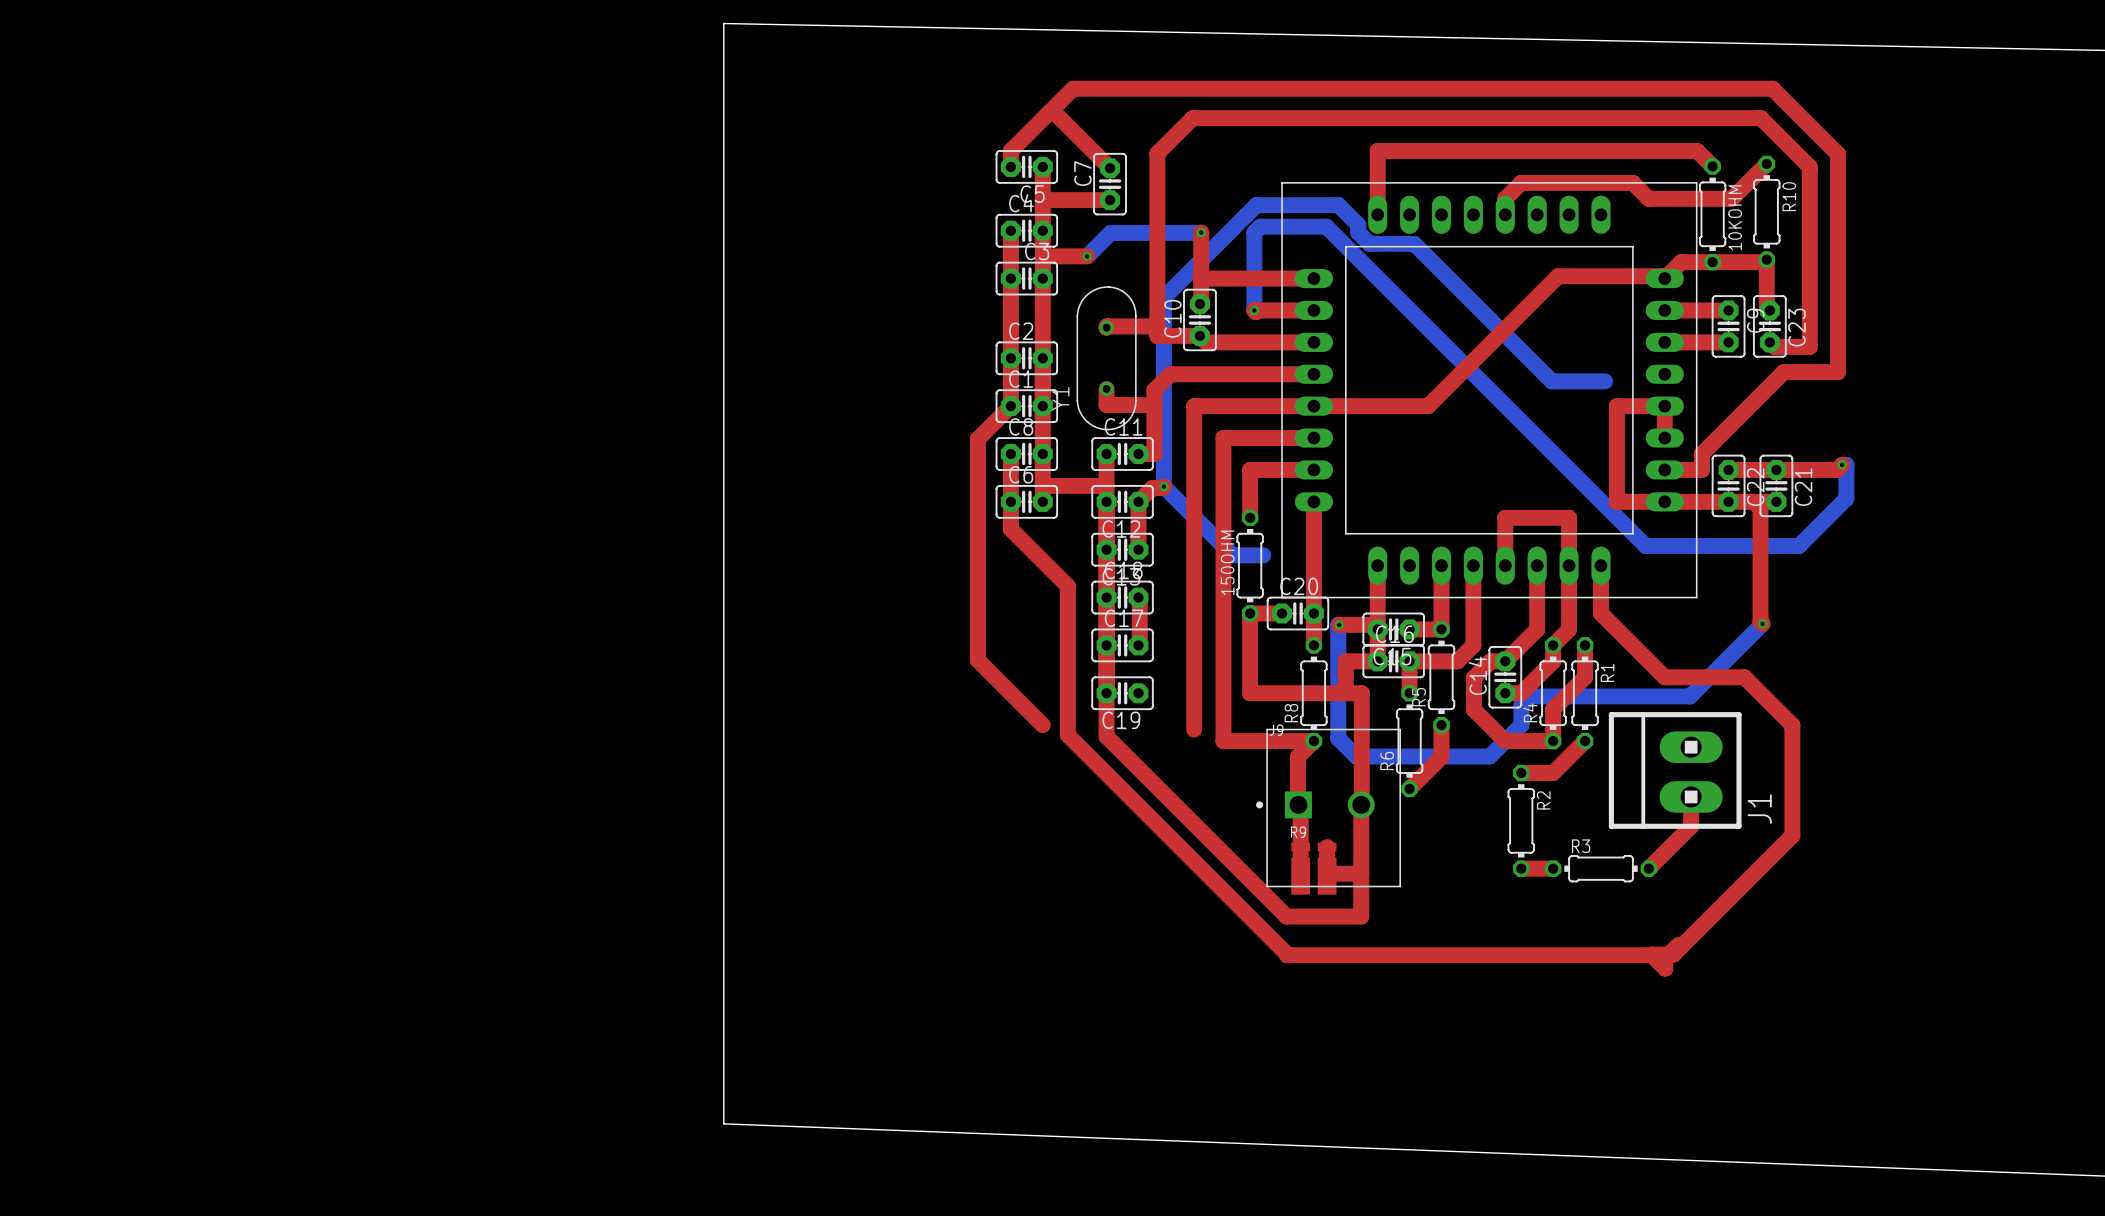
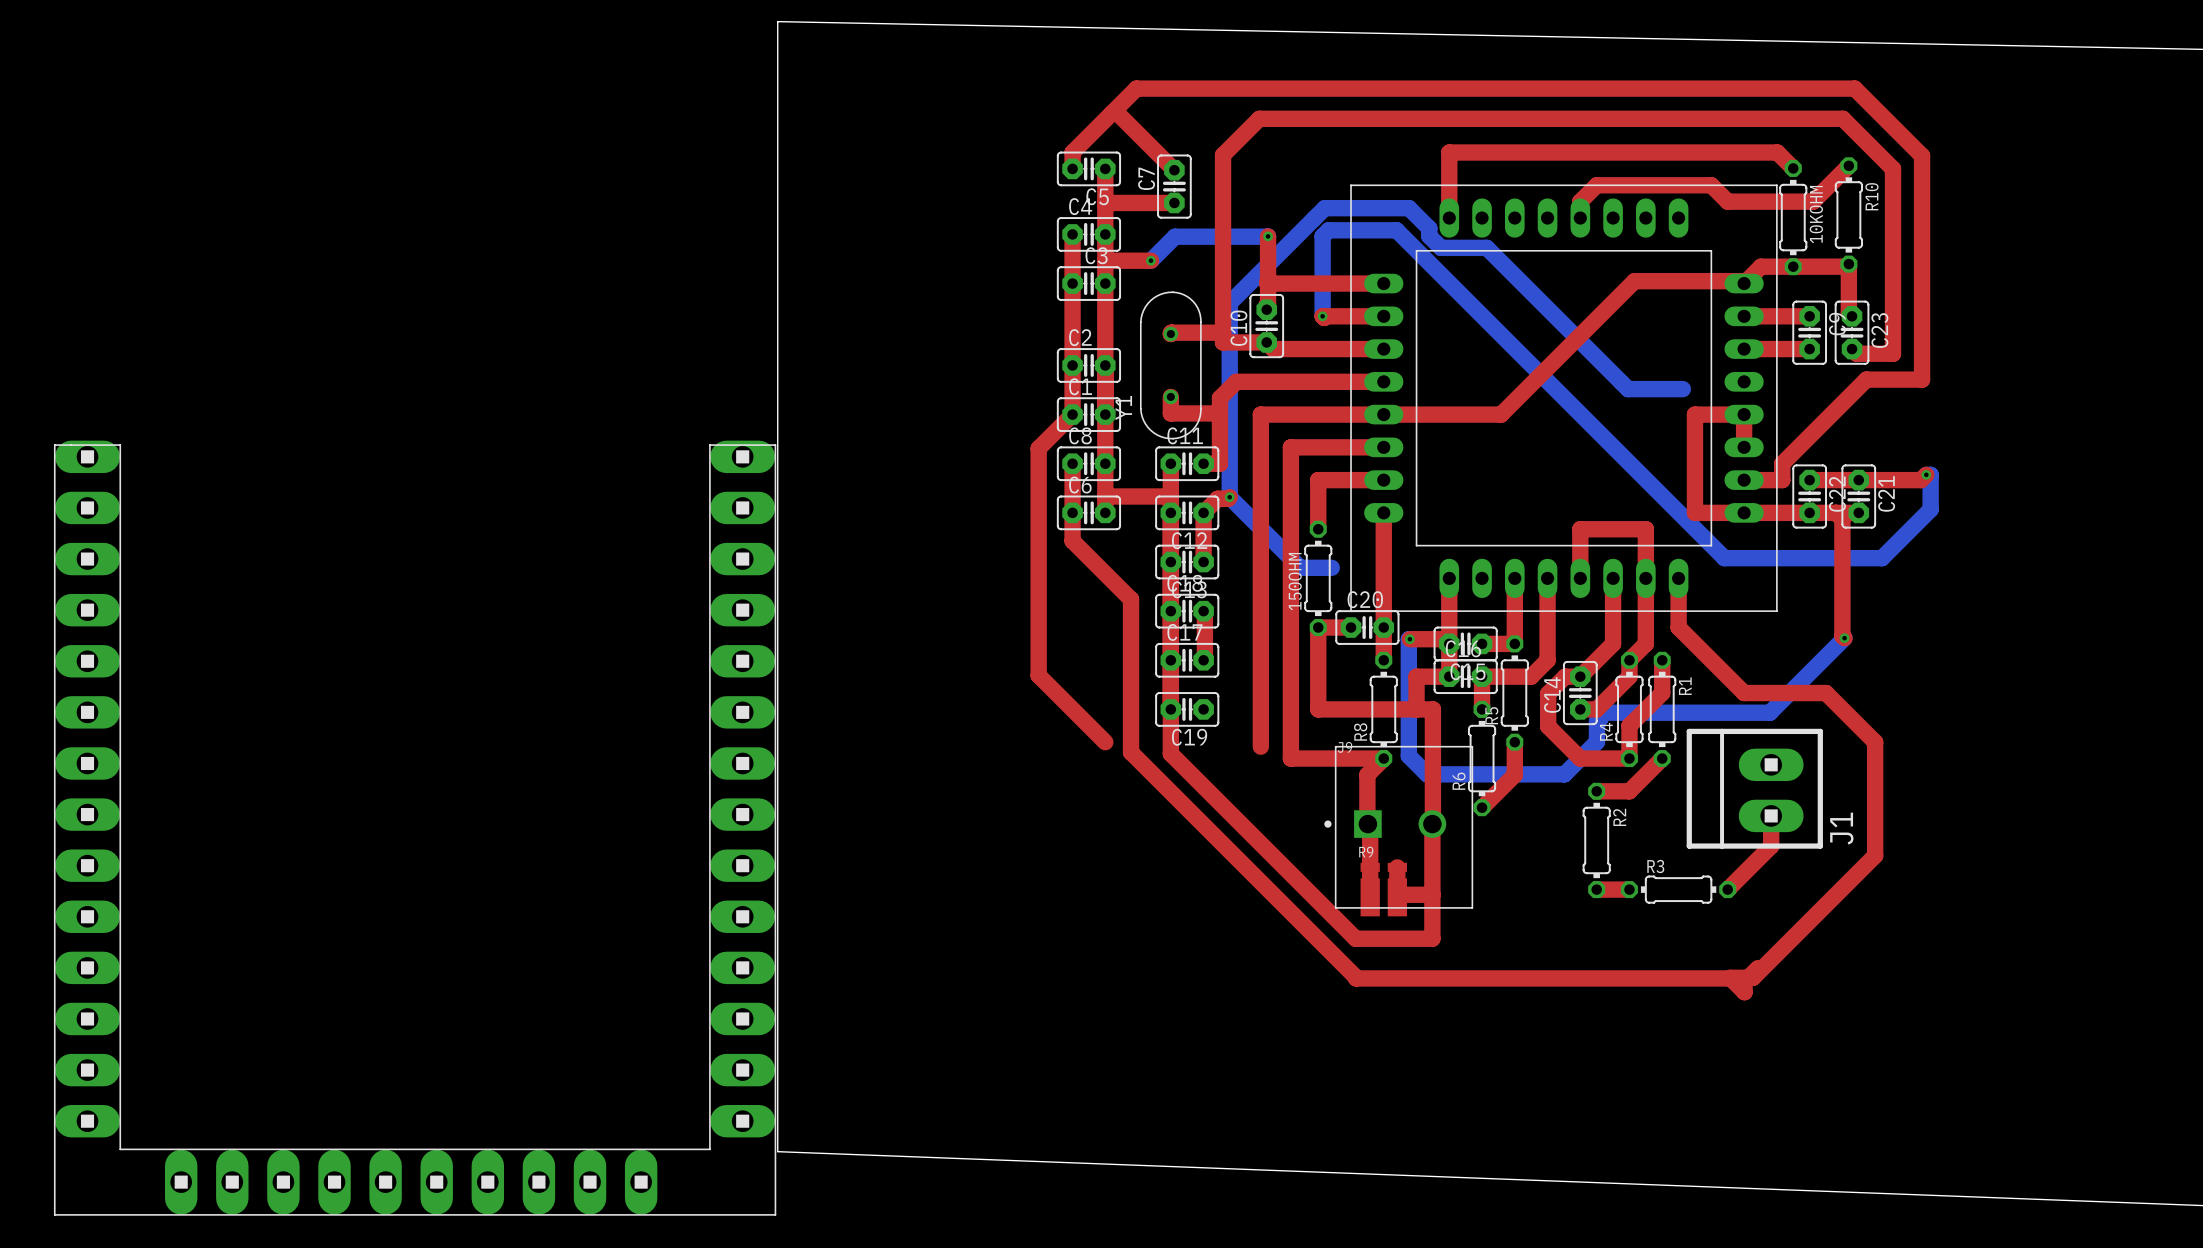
part: none -> (415, 828)

